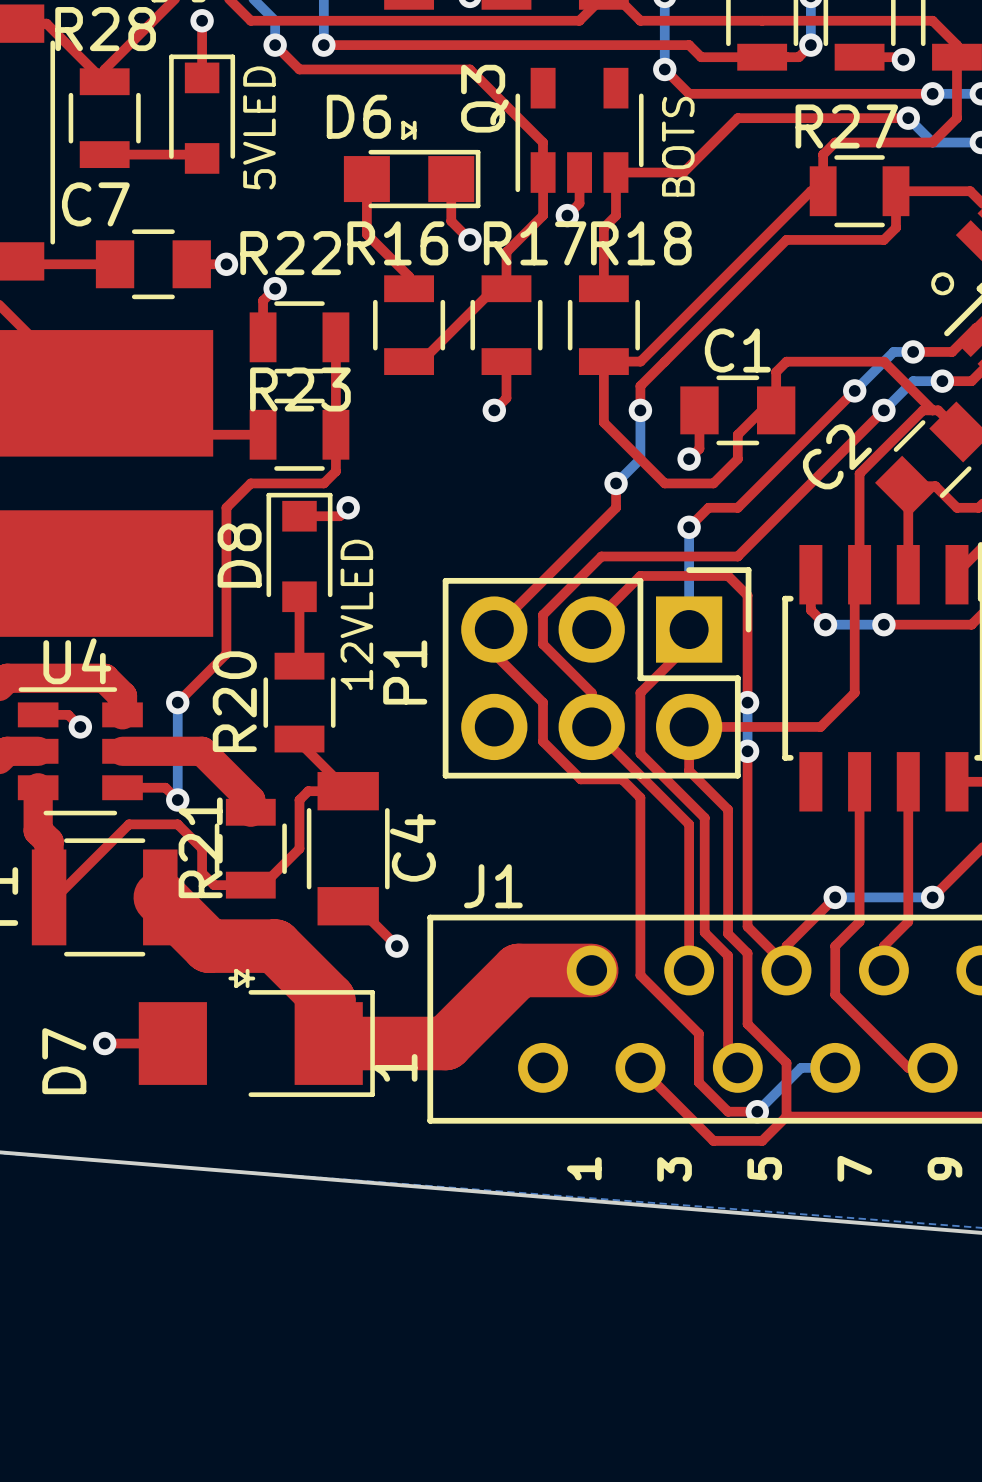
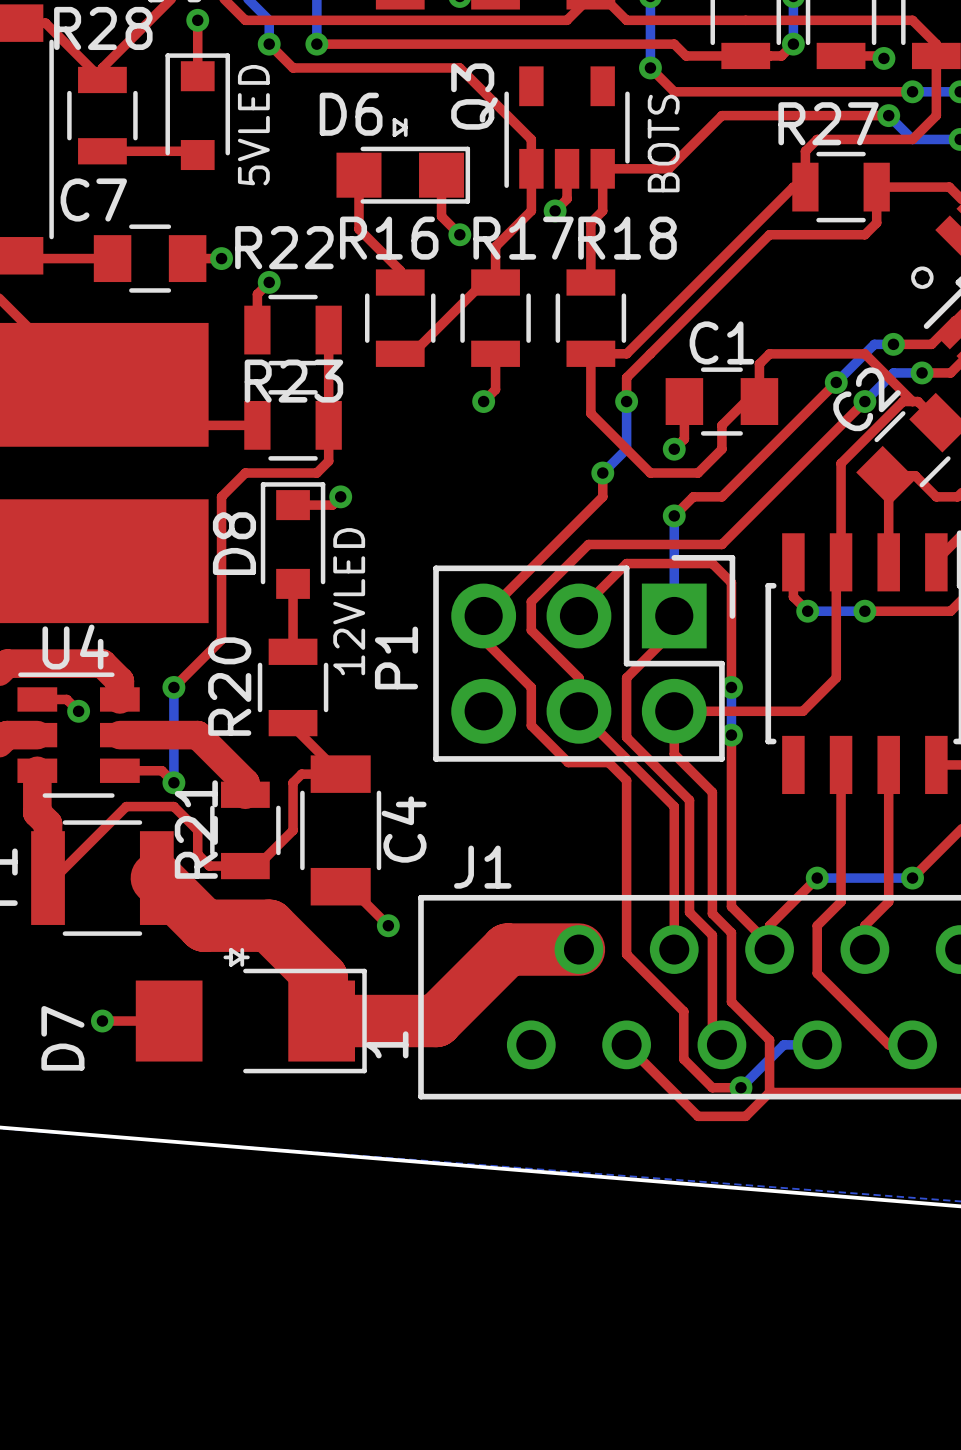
C2 name position: C2 (837, 456) -> C2 (867, 399)
text: 1 (584, 1168) -> none
text: 5 (764, 1168) -> none
text: 7 (854, 1168) -> none
text: 9 (944, 1168) -> none
text: 3 (674, 1169) -> none

